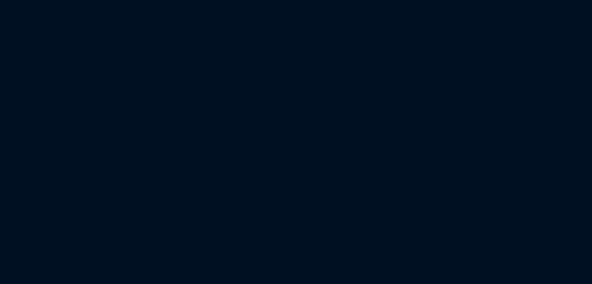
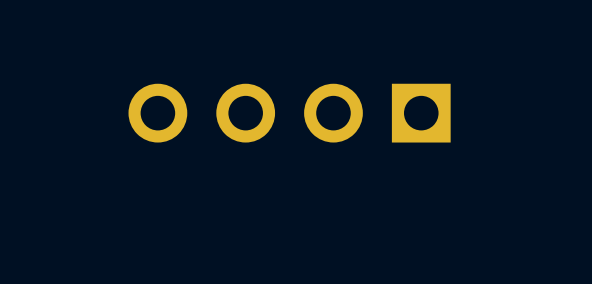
part: none -> (289, 113)

